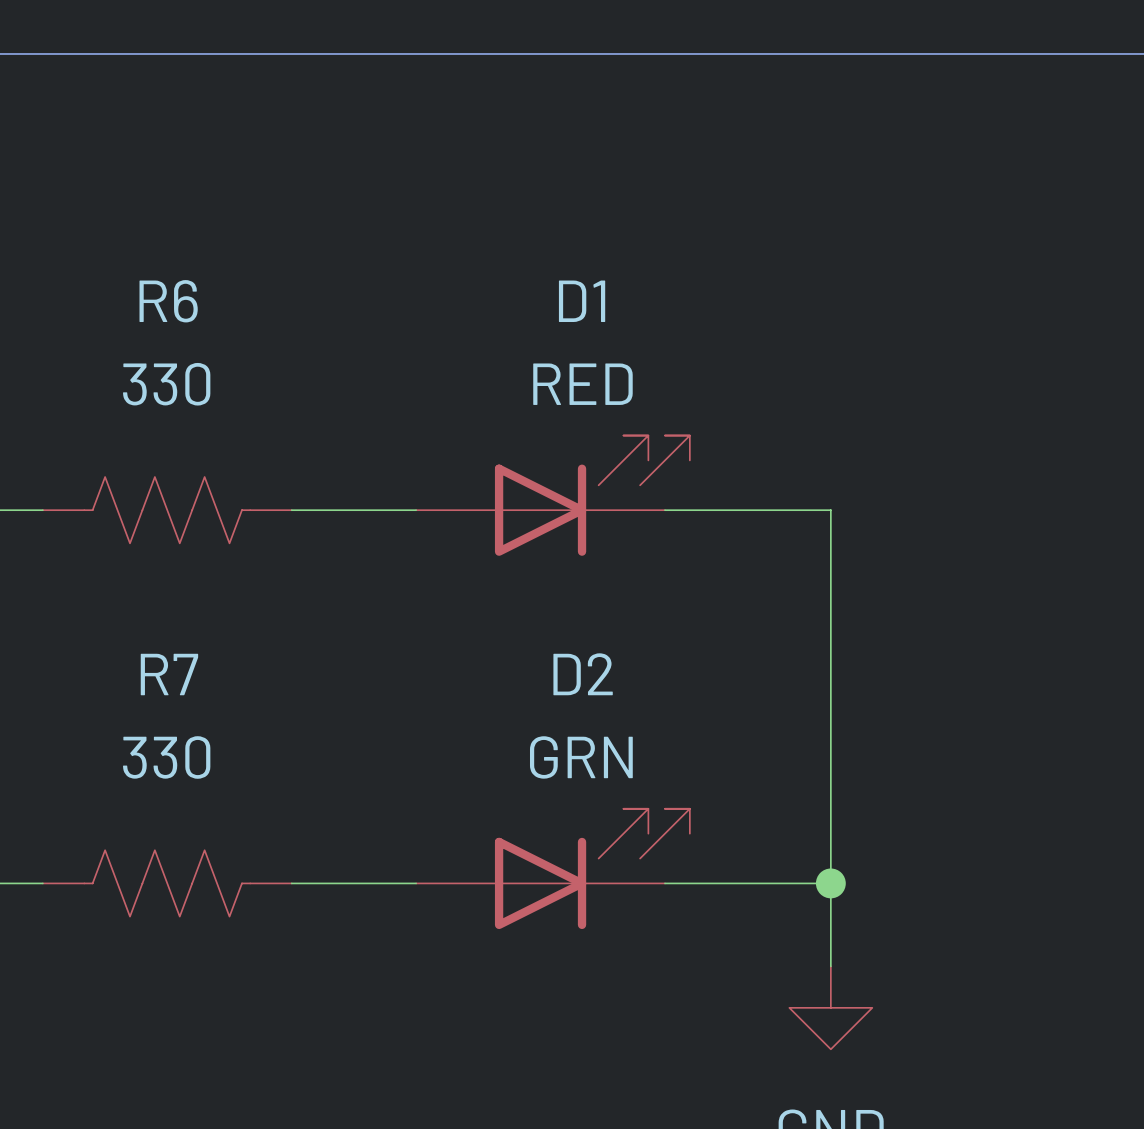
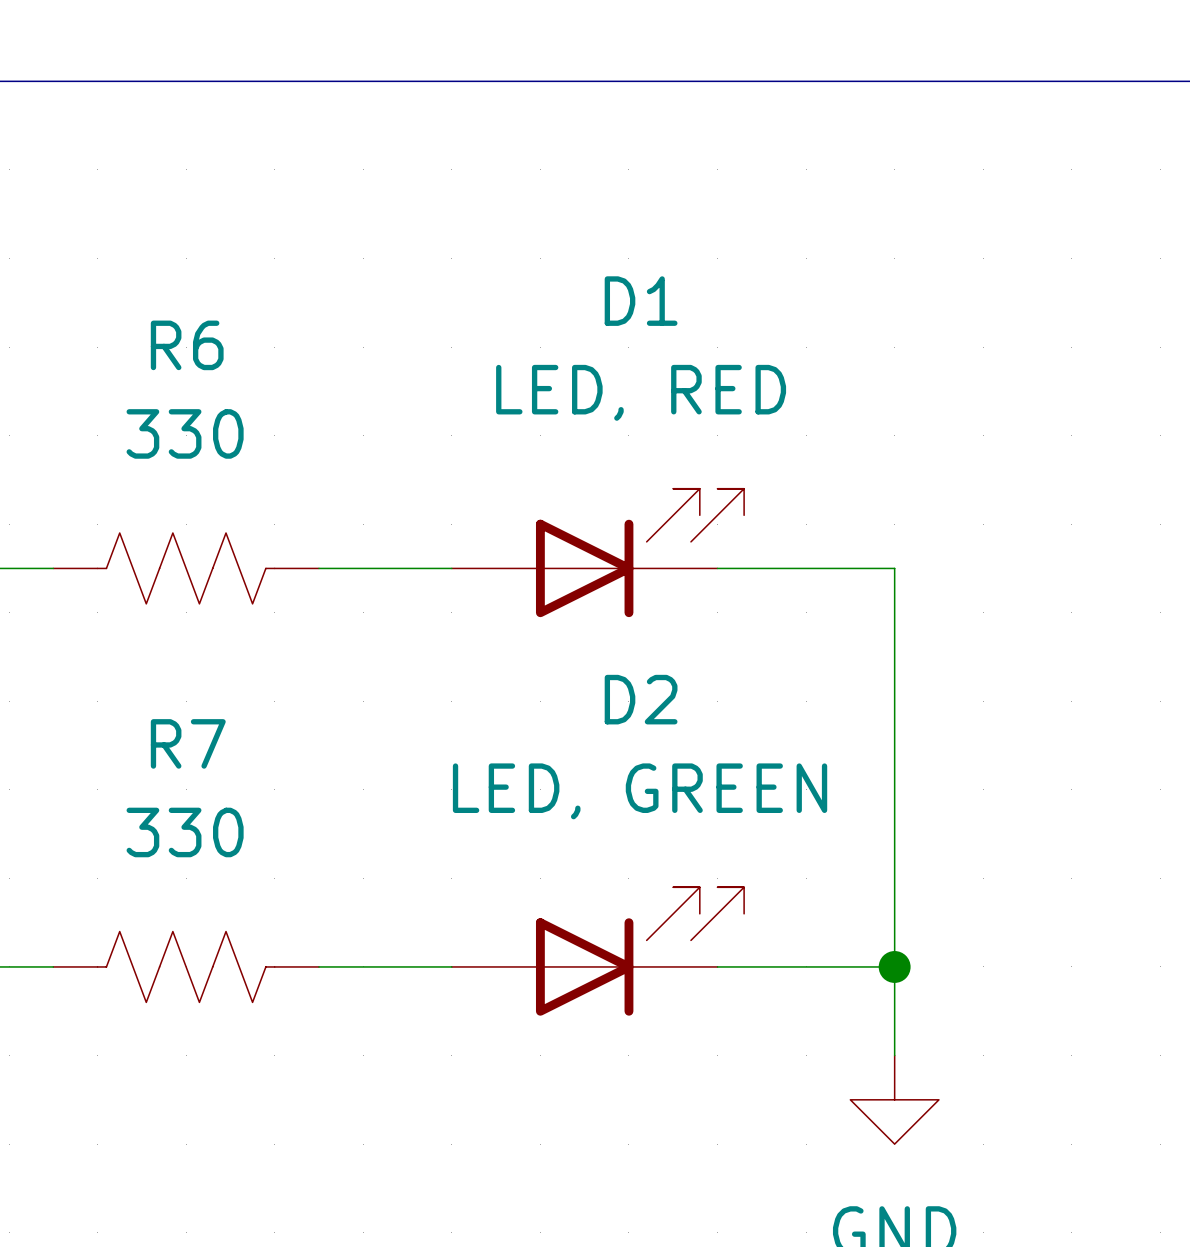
D1 name position: D1 (582, 301) -> D1 (641, 301)
D1 value: RED (582, 384) -> LED, RED (641, 392)
D2 name position: D2 (583, 674) -> D2 (641, 699)
D2 value: GRN (581, 757) -> LED, GREEN (640, 791)

